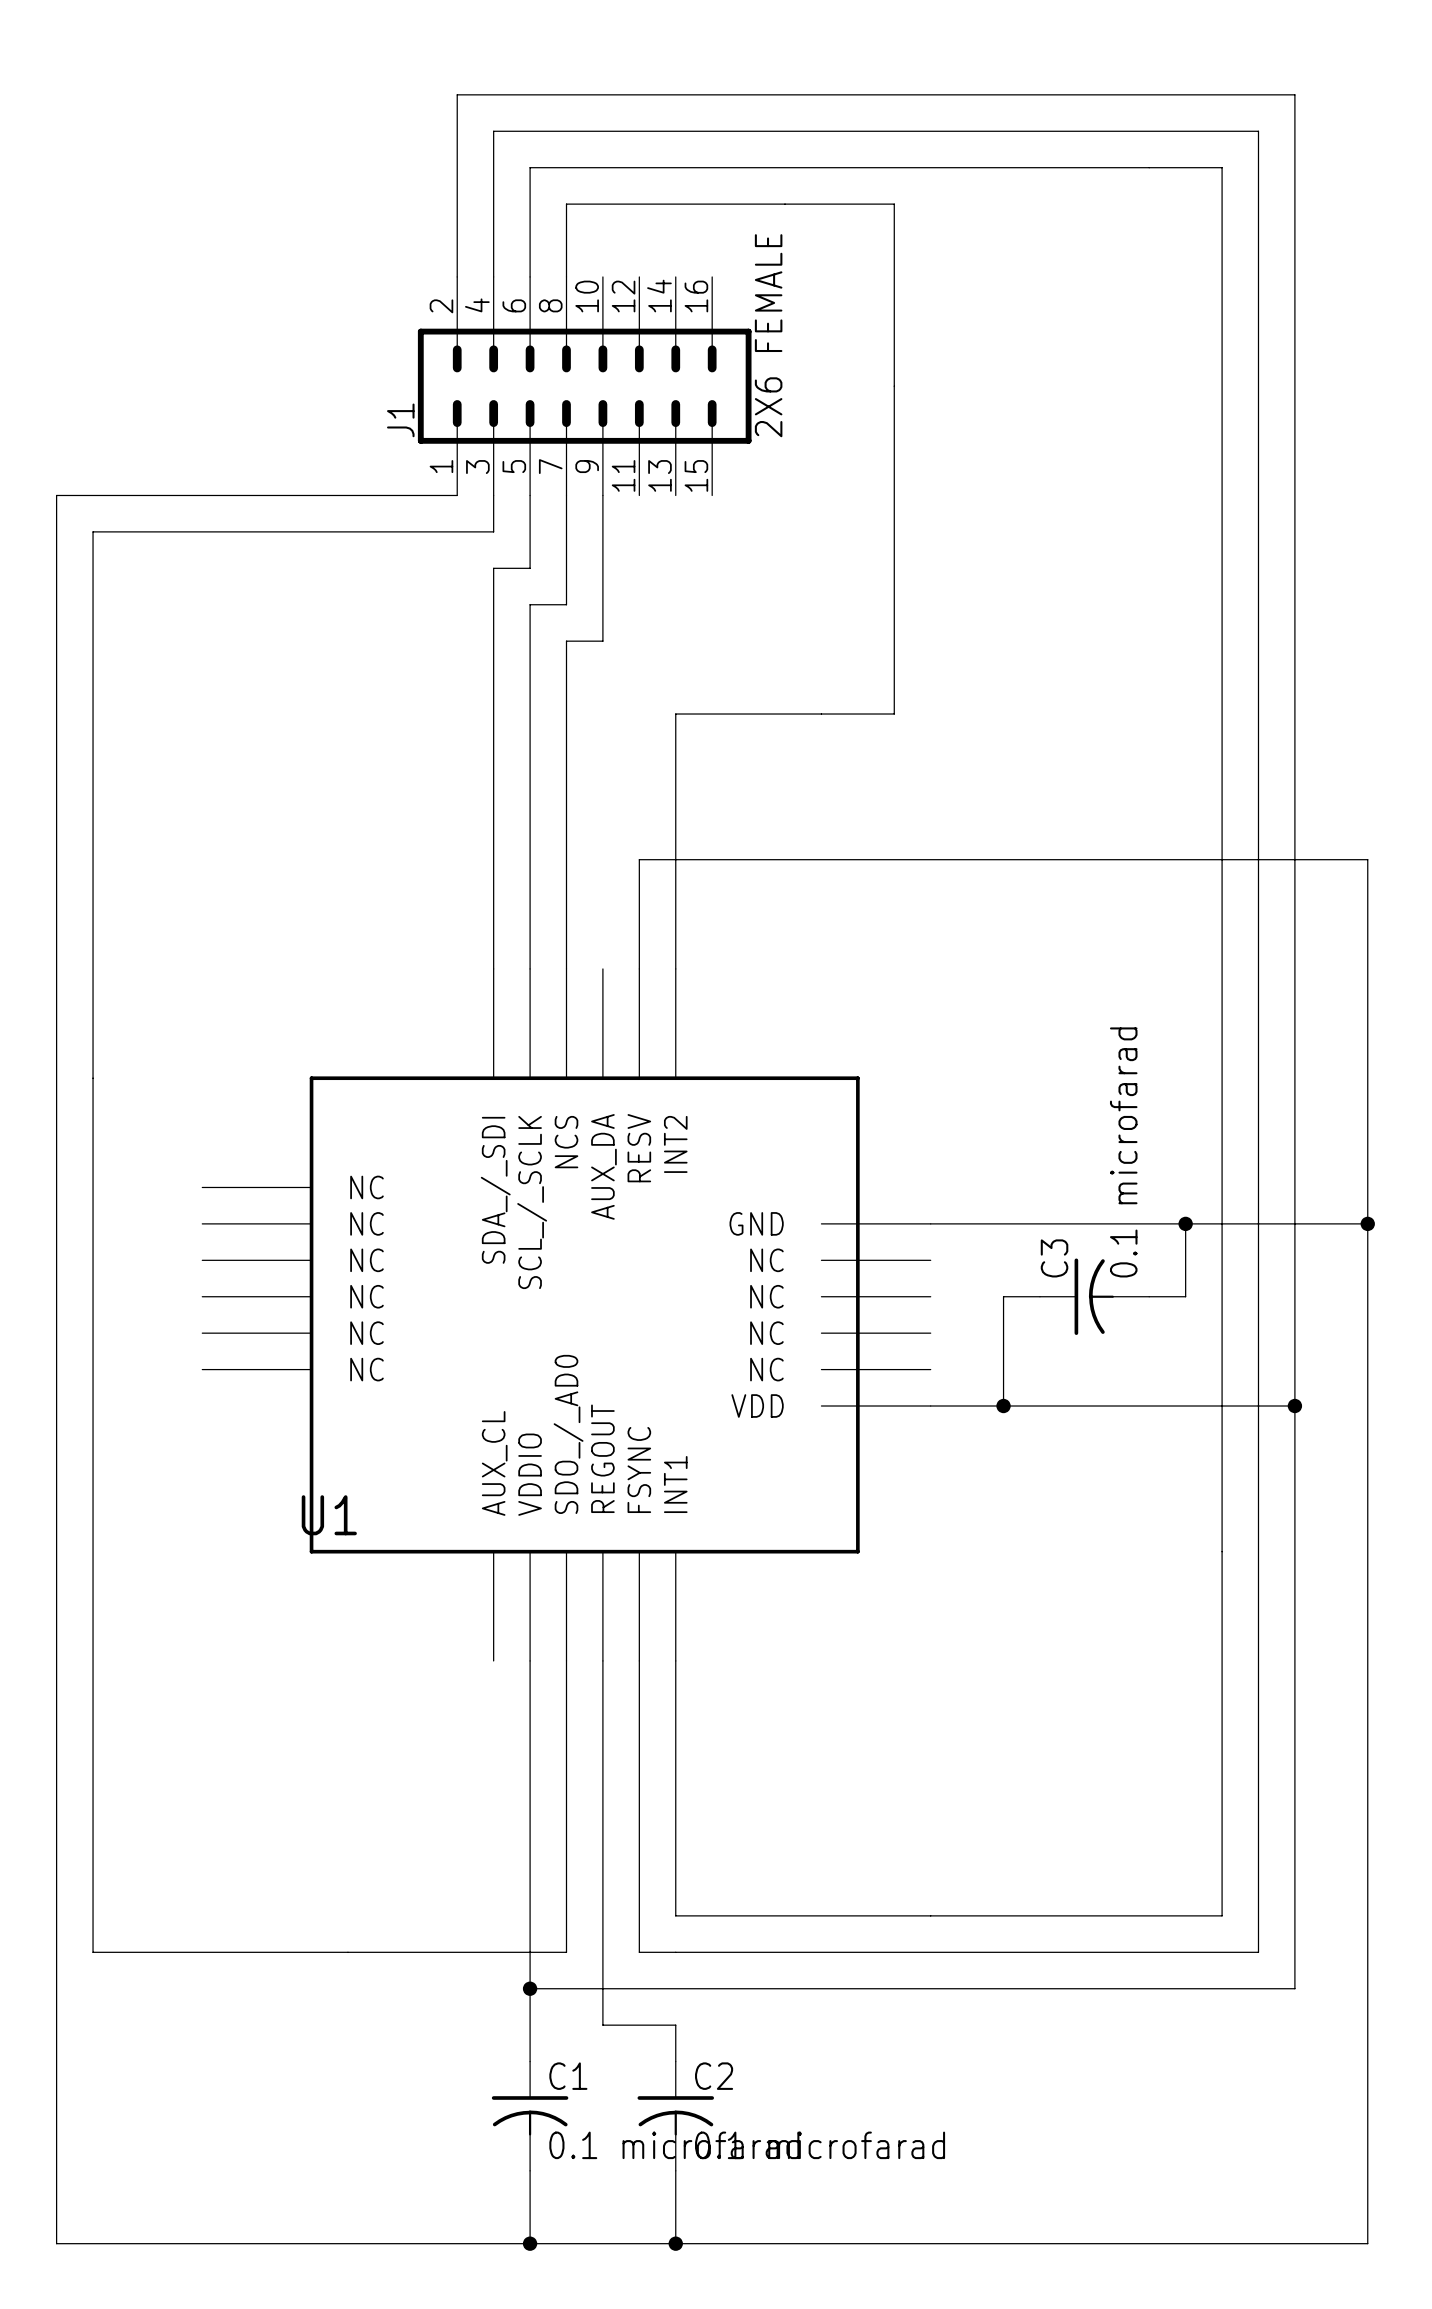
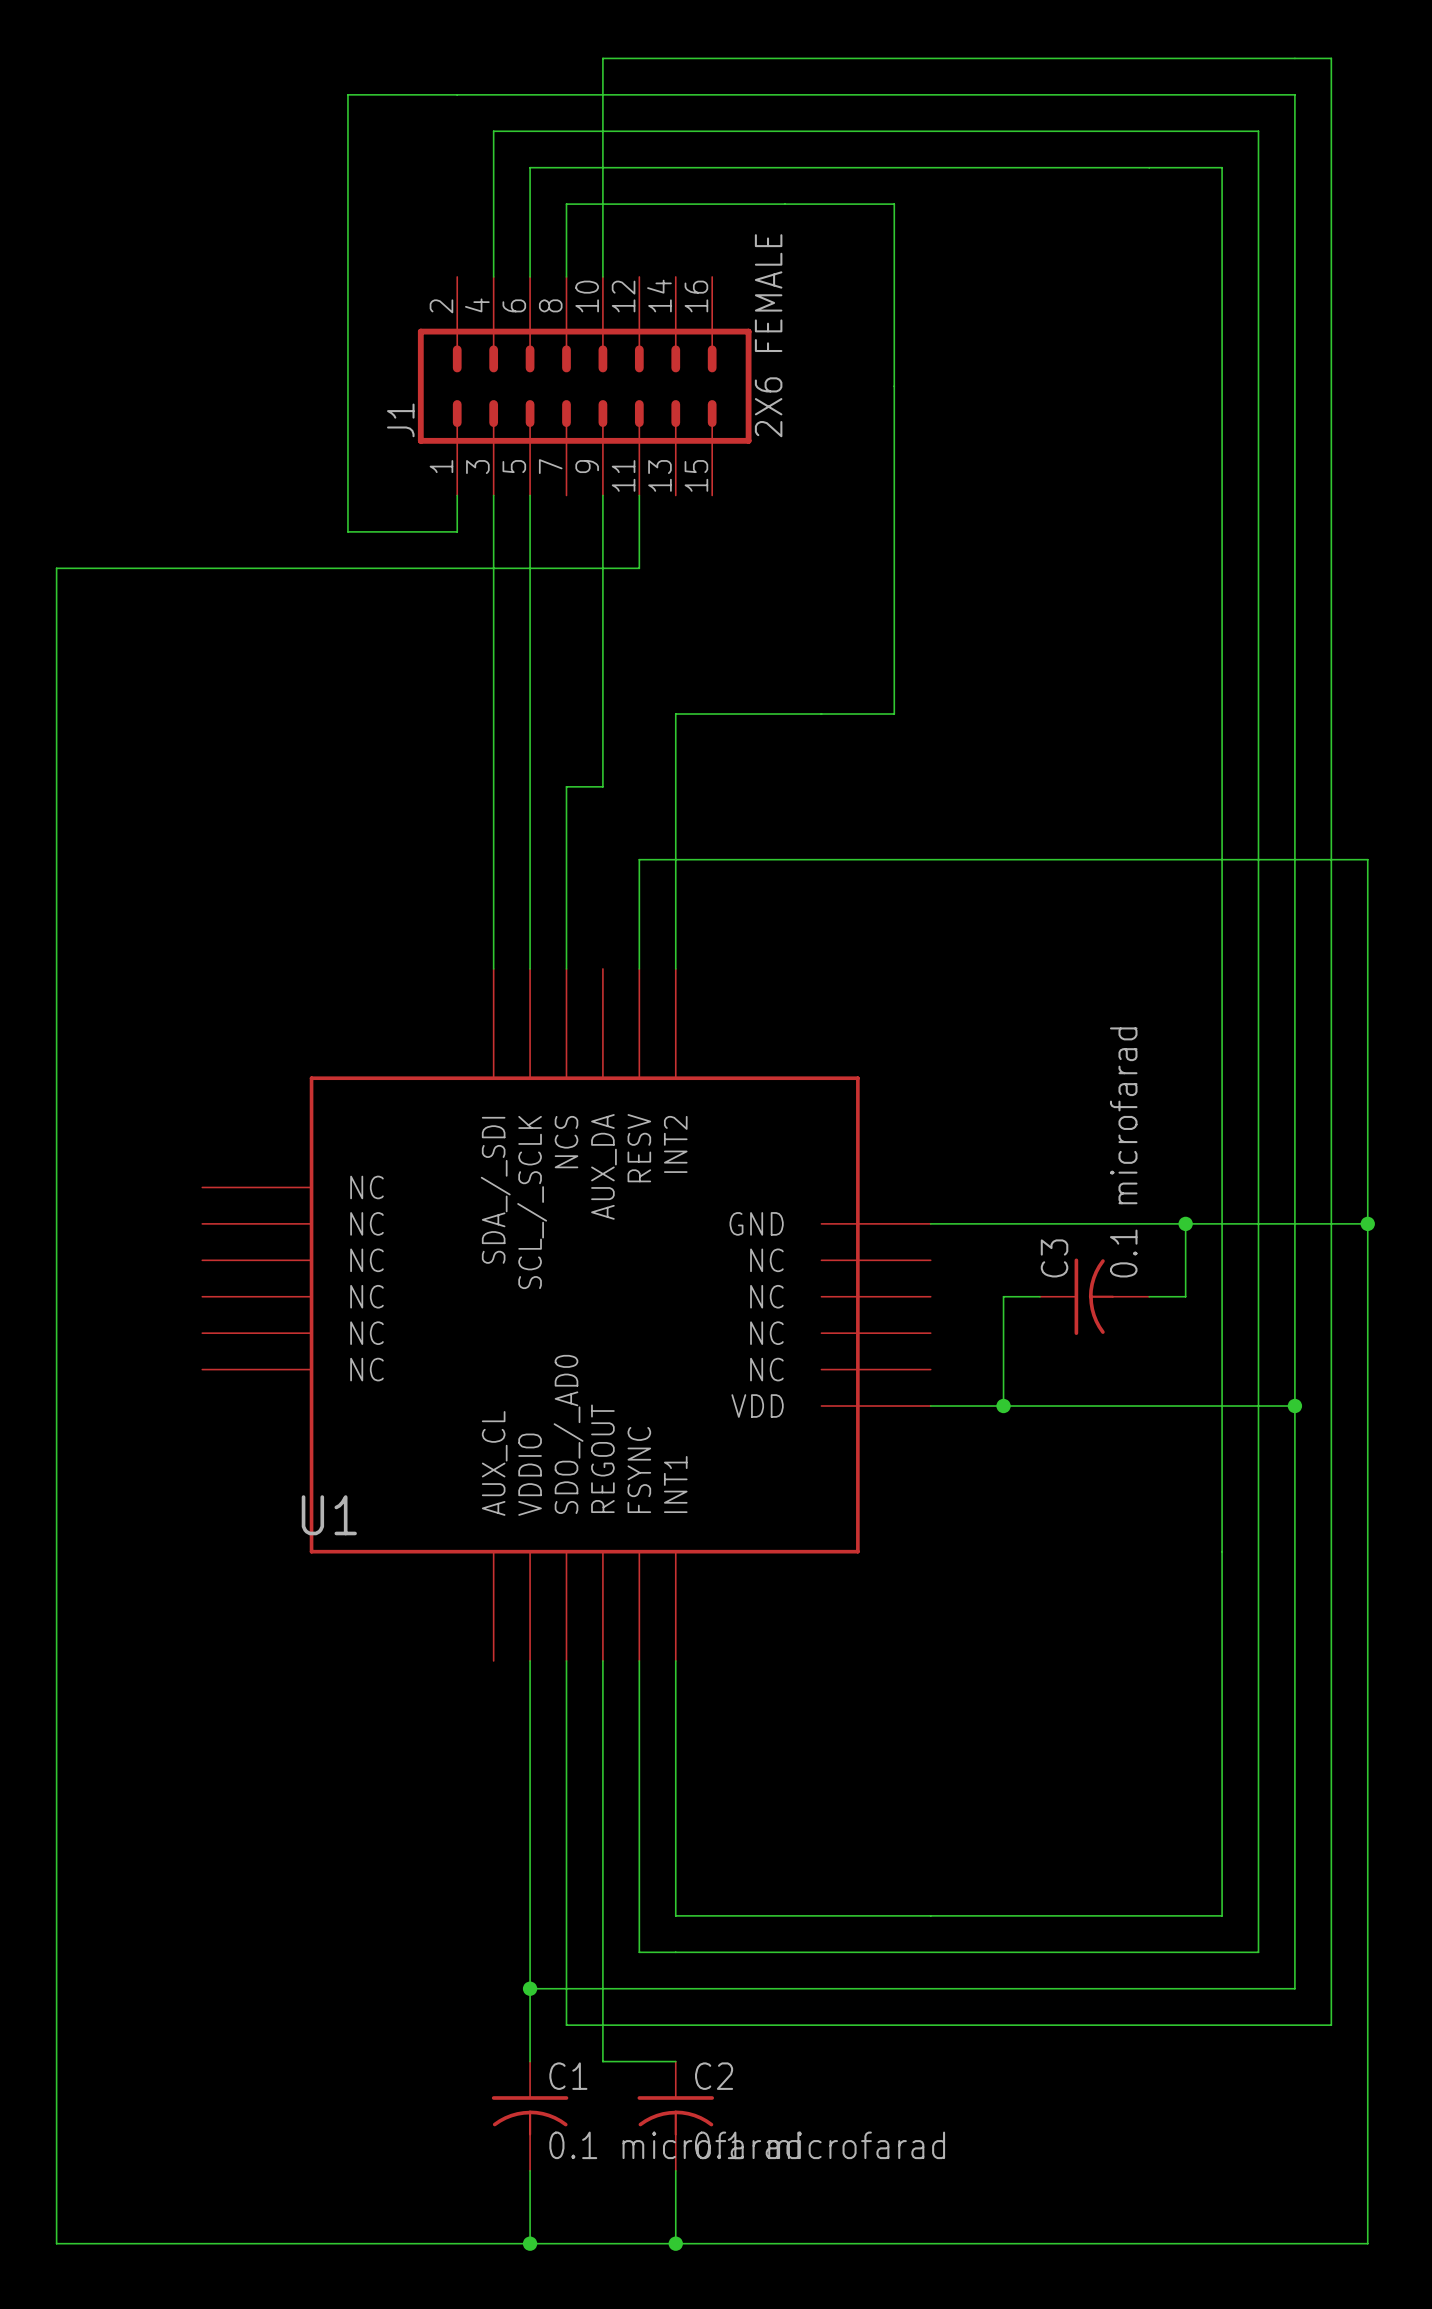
wire: (457, 94) (457, 276) -> (457, 94) (347, 94) (347, 531)
wire: none -> (602, 276) (602, 58) (1331, 58) (1331, 2025) (675, 2025)
wire: (457, 495) (56, 495) (56, 568) -> (493, 531) (493, 568) (56, 568)
wire: (566, 495) (566, 604) (530, 604) -> (639, 495) (639, 568) (530, 568) (530, 604)
wire: (347, 531) (93, 531) (93, 1952) (566, 1952) -> none
wire: (457, 531) (493, 531) -> (457, 531) (457, 495)
wire: (602, 641) (566, 641) (566, 786) -> (602, 641) (602, 786) (566, 786)
wire: (675, 2025) (675, 2061) -> (566, 1952) (566, 2025) (602, 2025) (602, 2061) (675, 2061)

